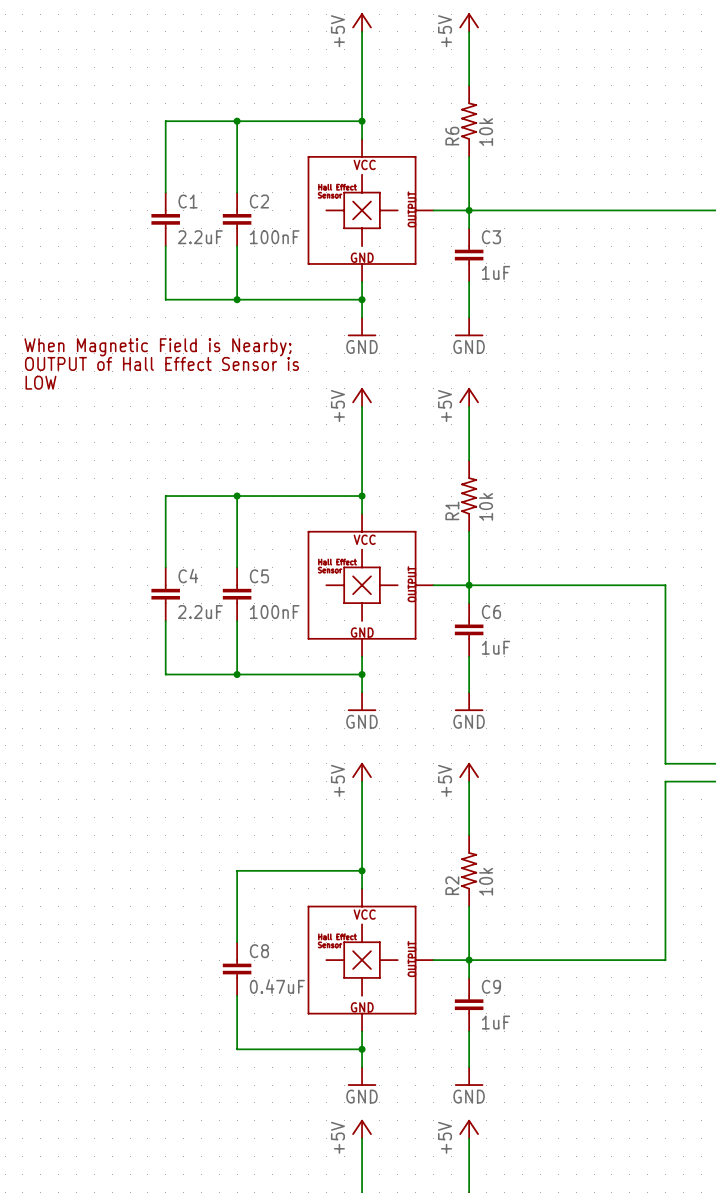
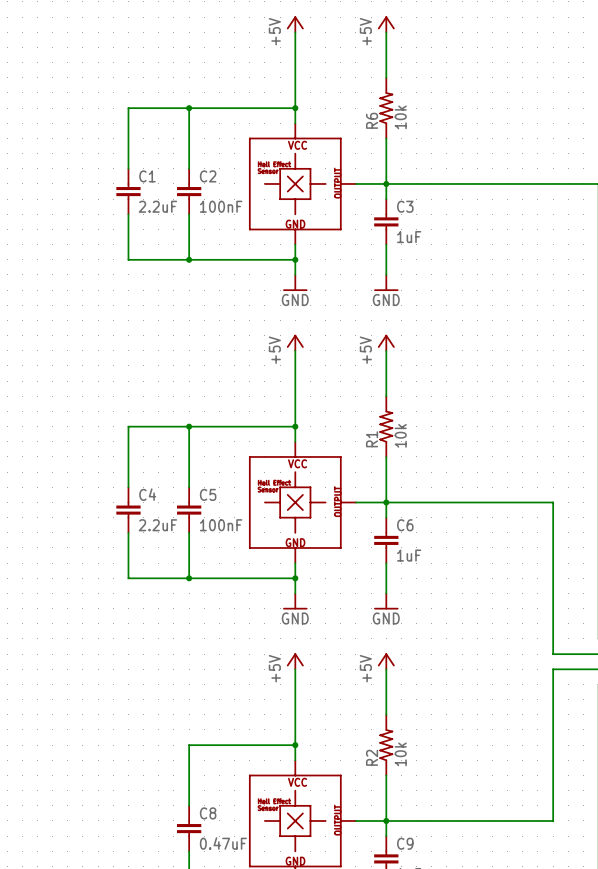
text: When Magnetic Field is Nearby; (157, 347) -> none
text: OUTPUT of Hall Effect Sensor is (161, 363) -> none
text: LOW (40, 382) -> none

